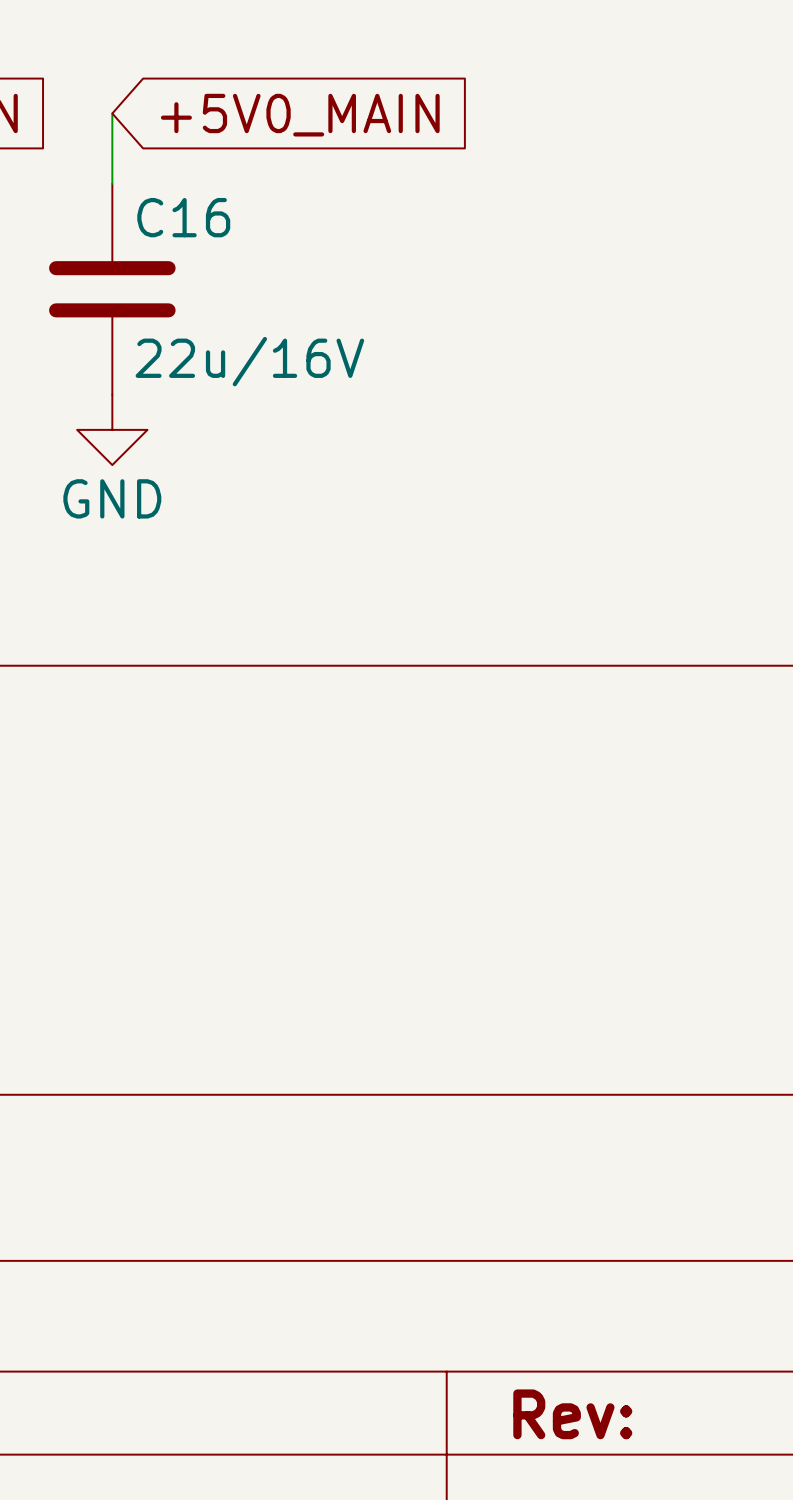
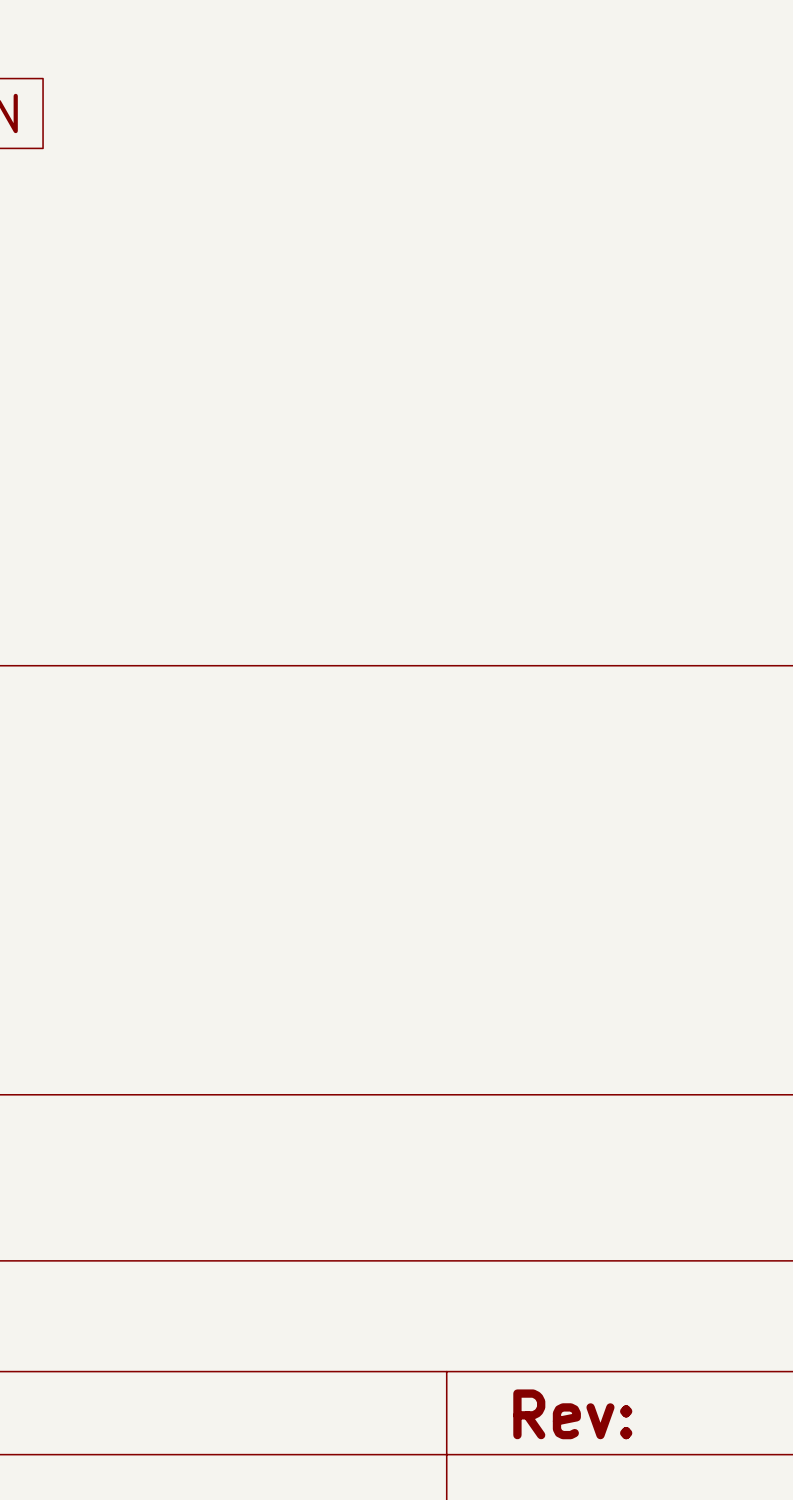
wire: (112, 113) (112, 183) -> none
global label: +5V0_MAIN (300, 115) -> none
C16: 22u/16V (112, 289) -> none
power symbol: GND (112, 429) -> none

